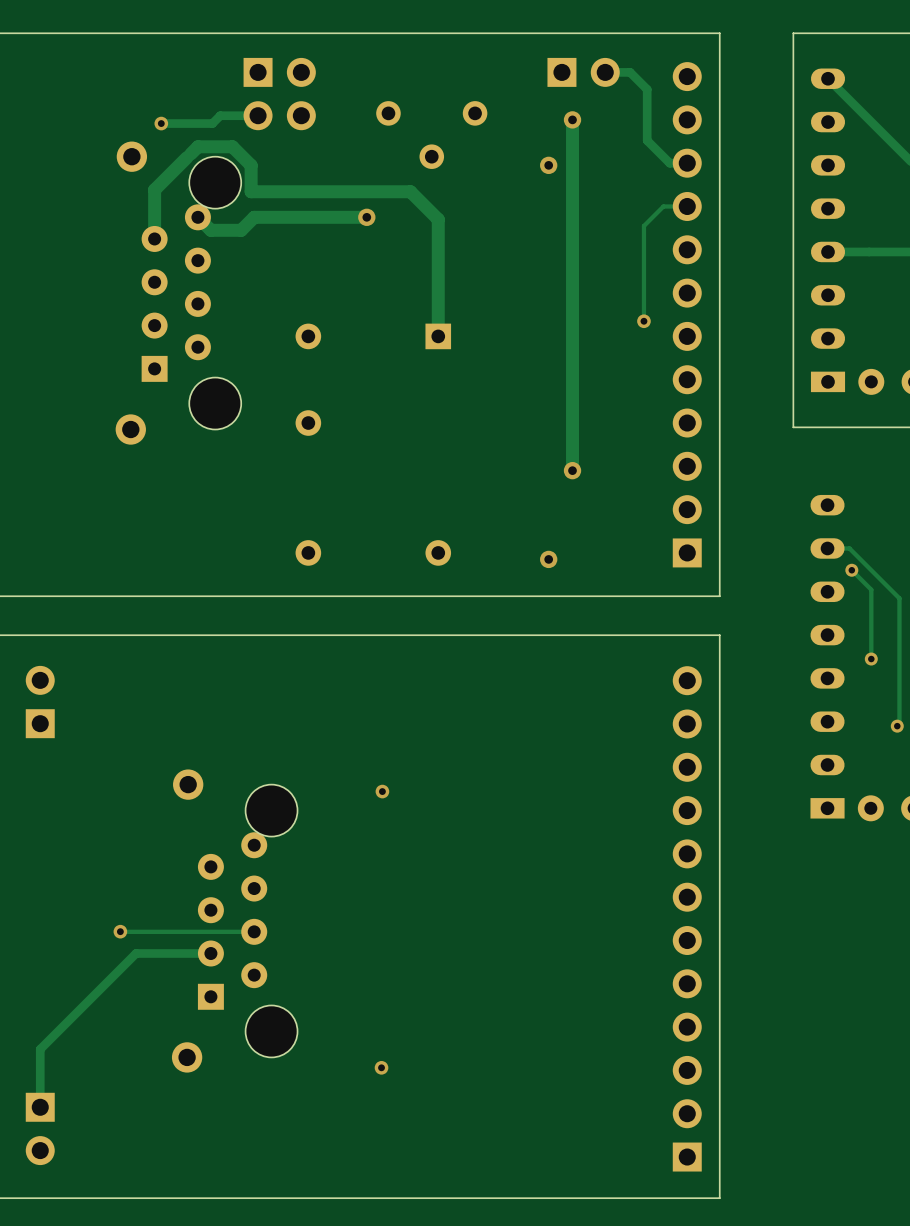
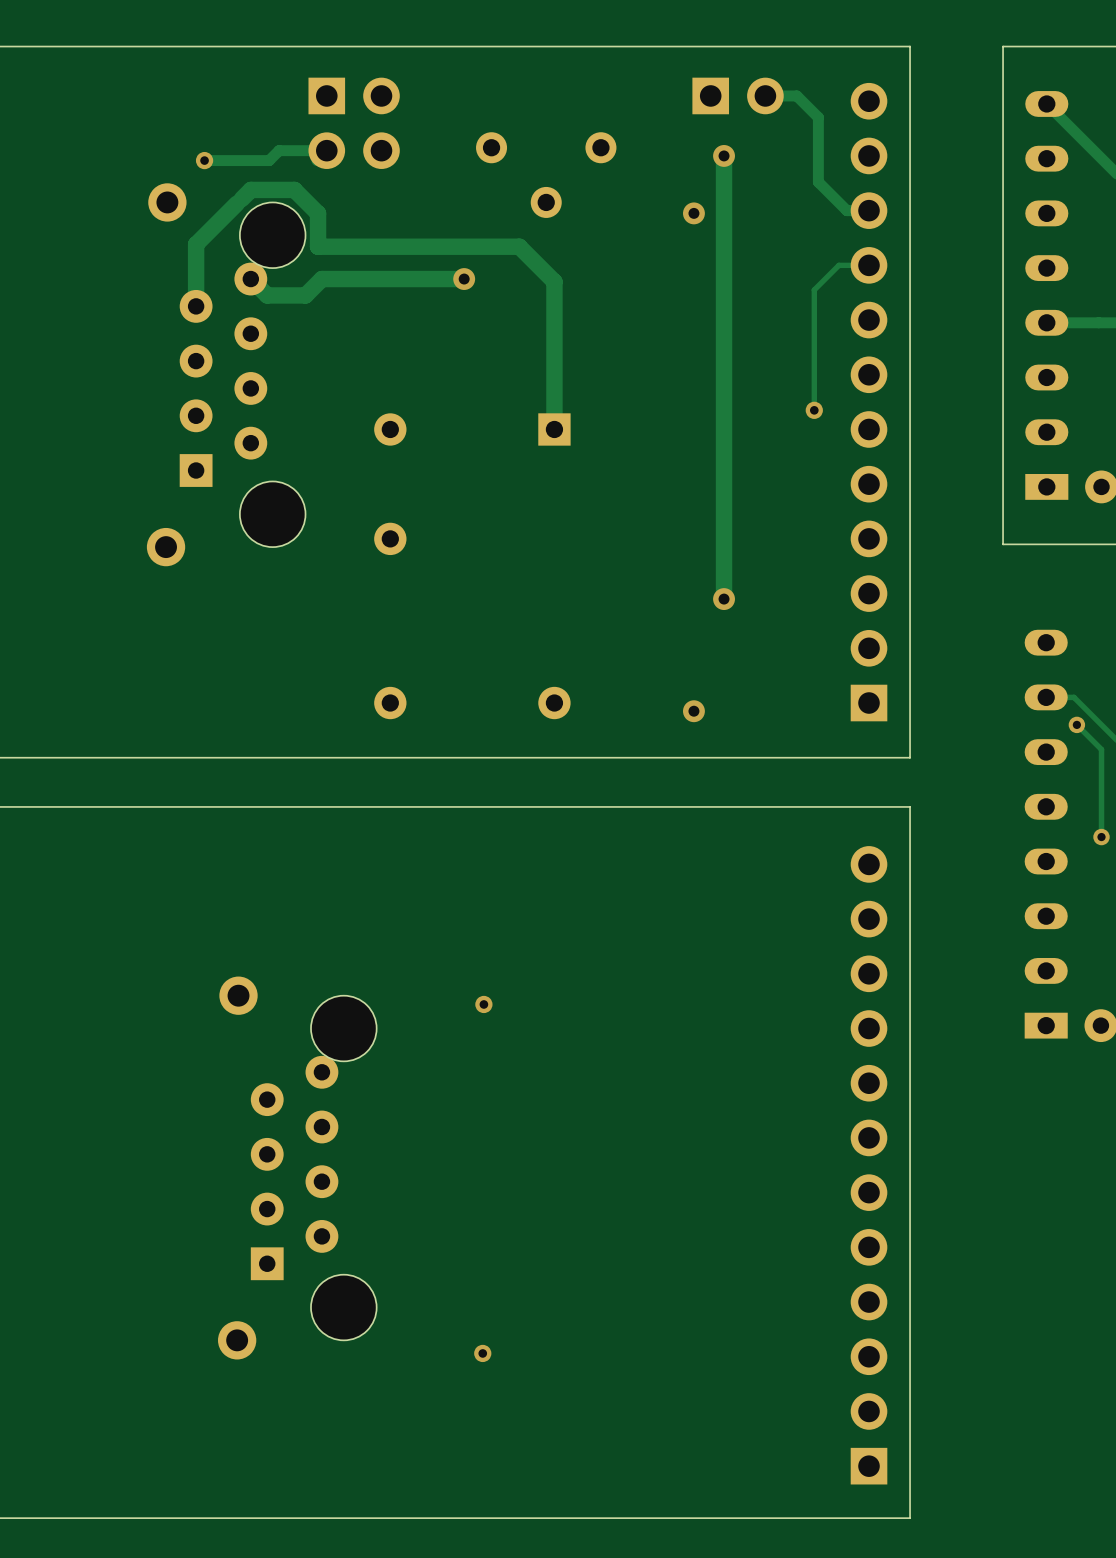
part: (40, 702) -> none
via: (120, 931) -> none
track: (254, 931) (120, 931) -> none
track: (210, 953) (136, 953) (40, 1049) (40, 1107) -> none
part: (40, 1128) -> none

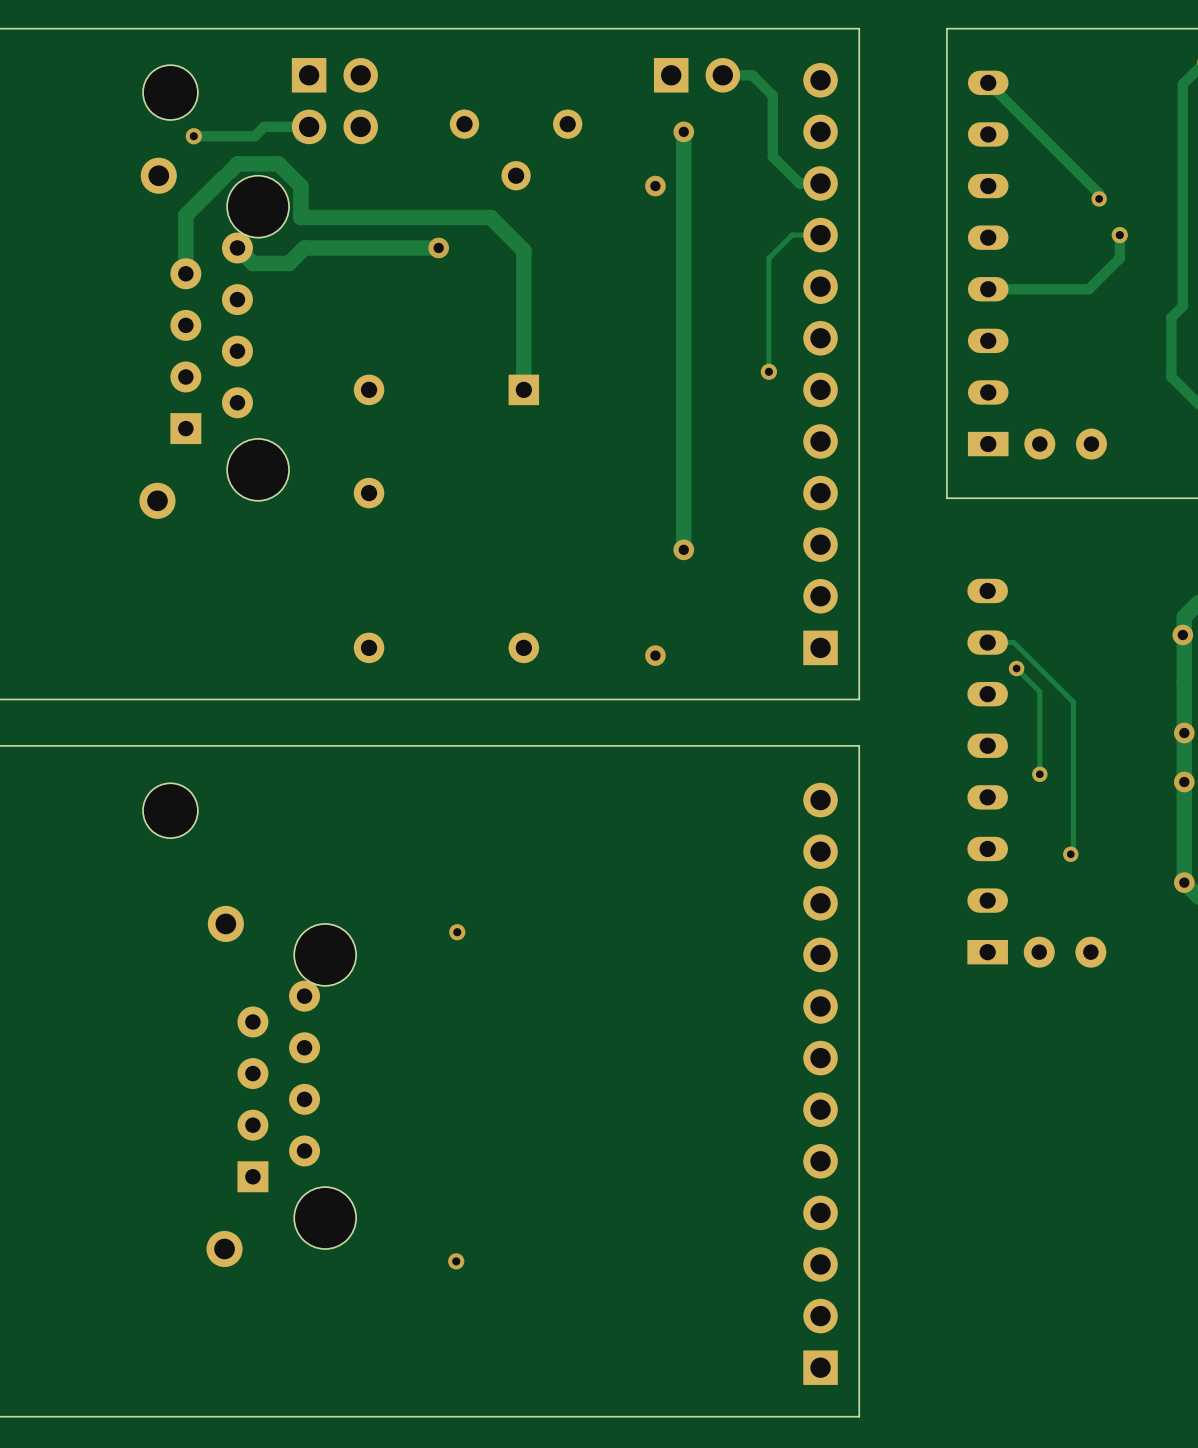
part: none -> (170, 92)
part: none -> (170, 810)

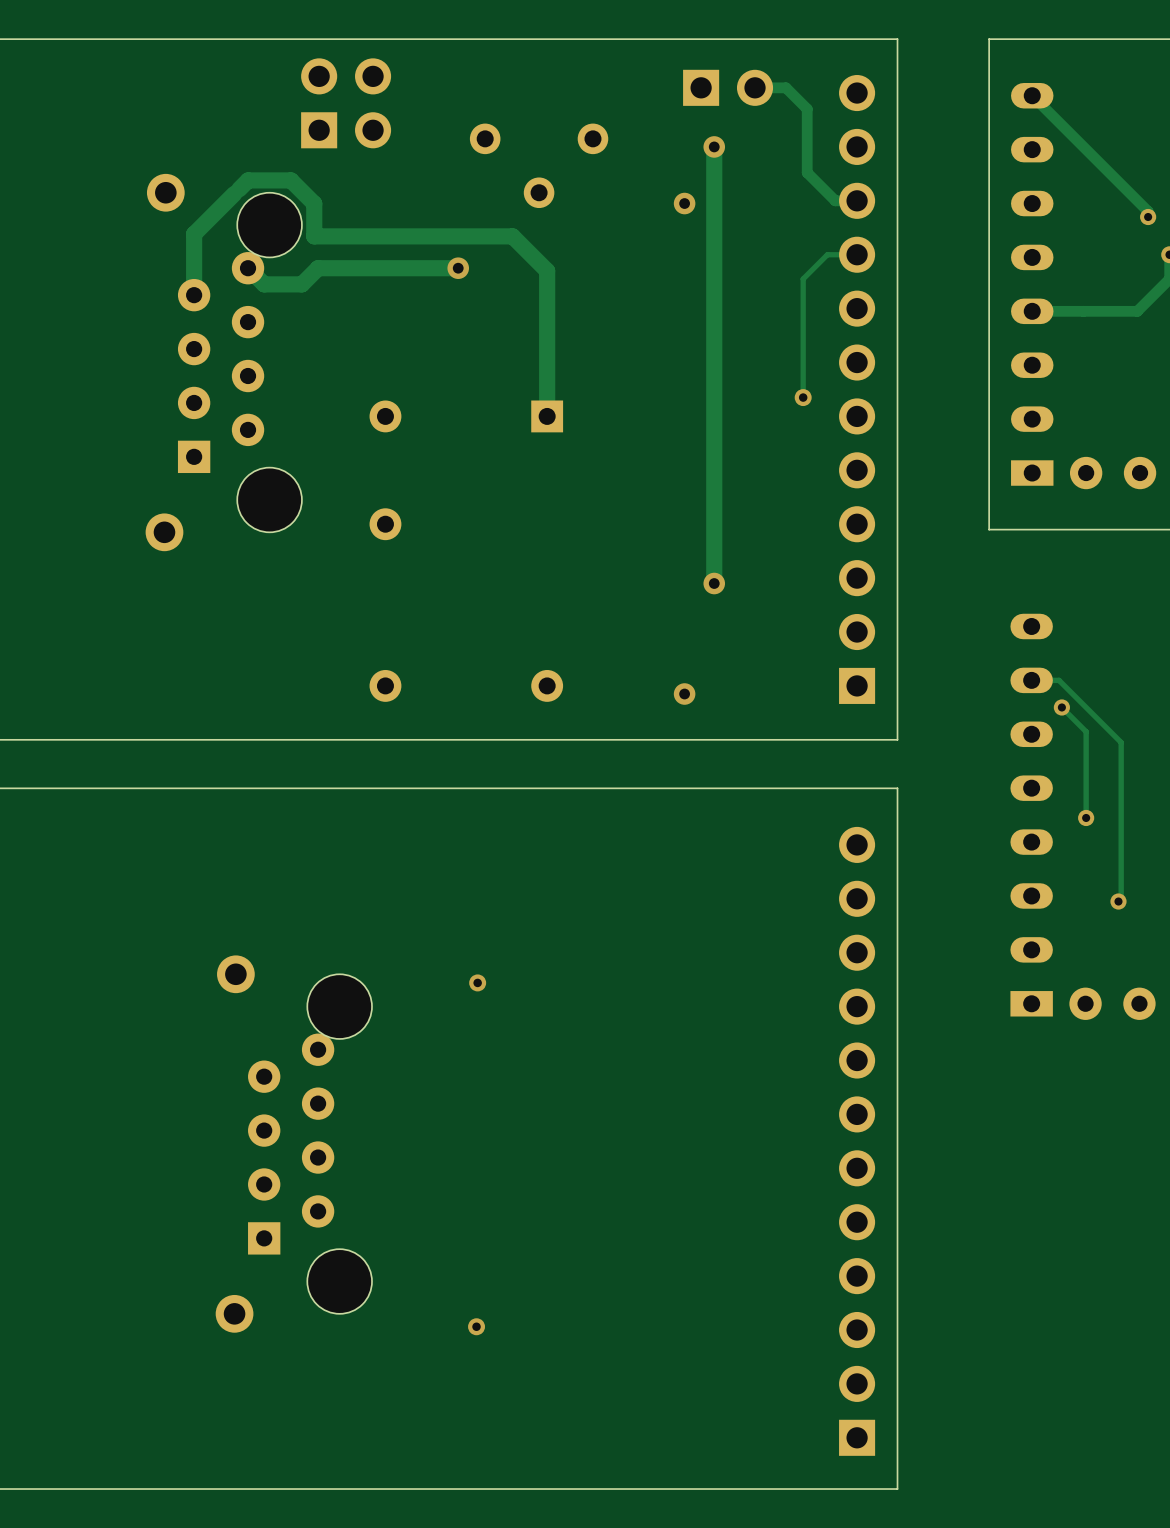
part: (170, 92) -> none
part rotation: 0° (334, 101) -> 90° counterclockwise (346, 103)
via: (193, 136) -> none
track: (299, 136) (309, 126) (264, 126) (254, 136) (193, 136) -> none
part: (170, 810) -> none

